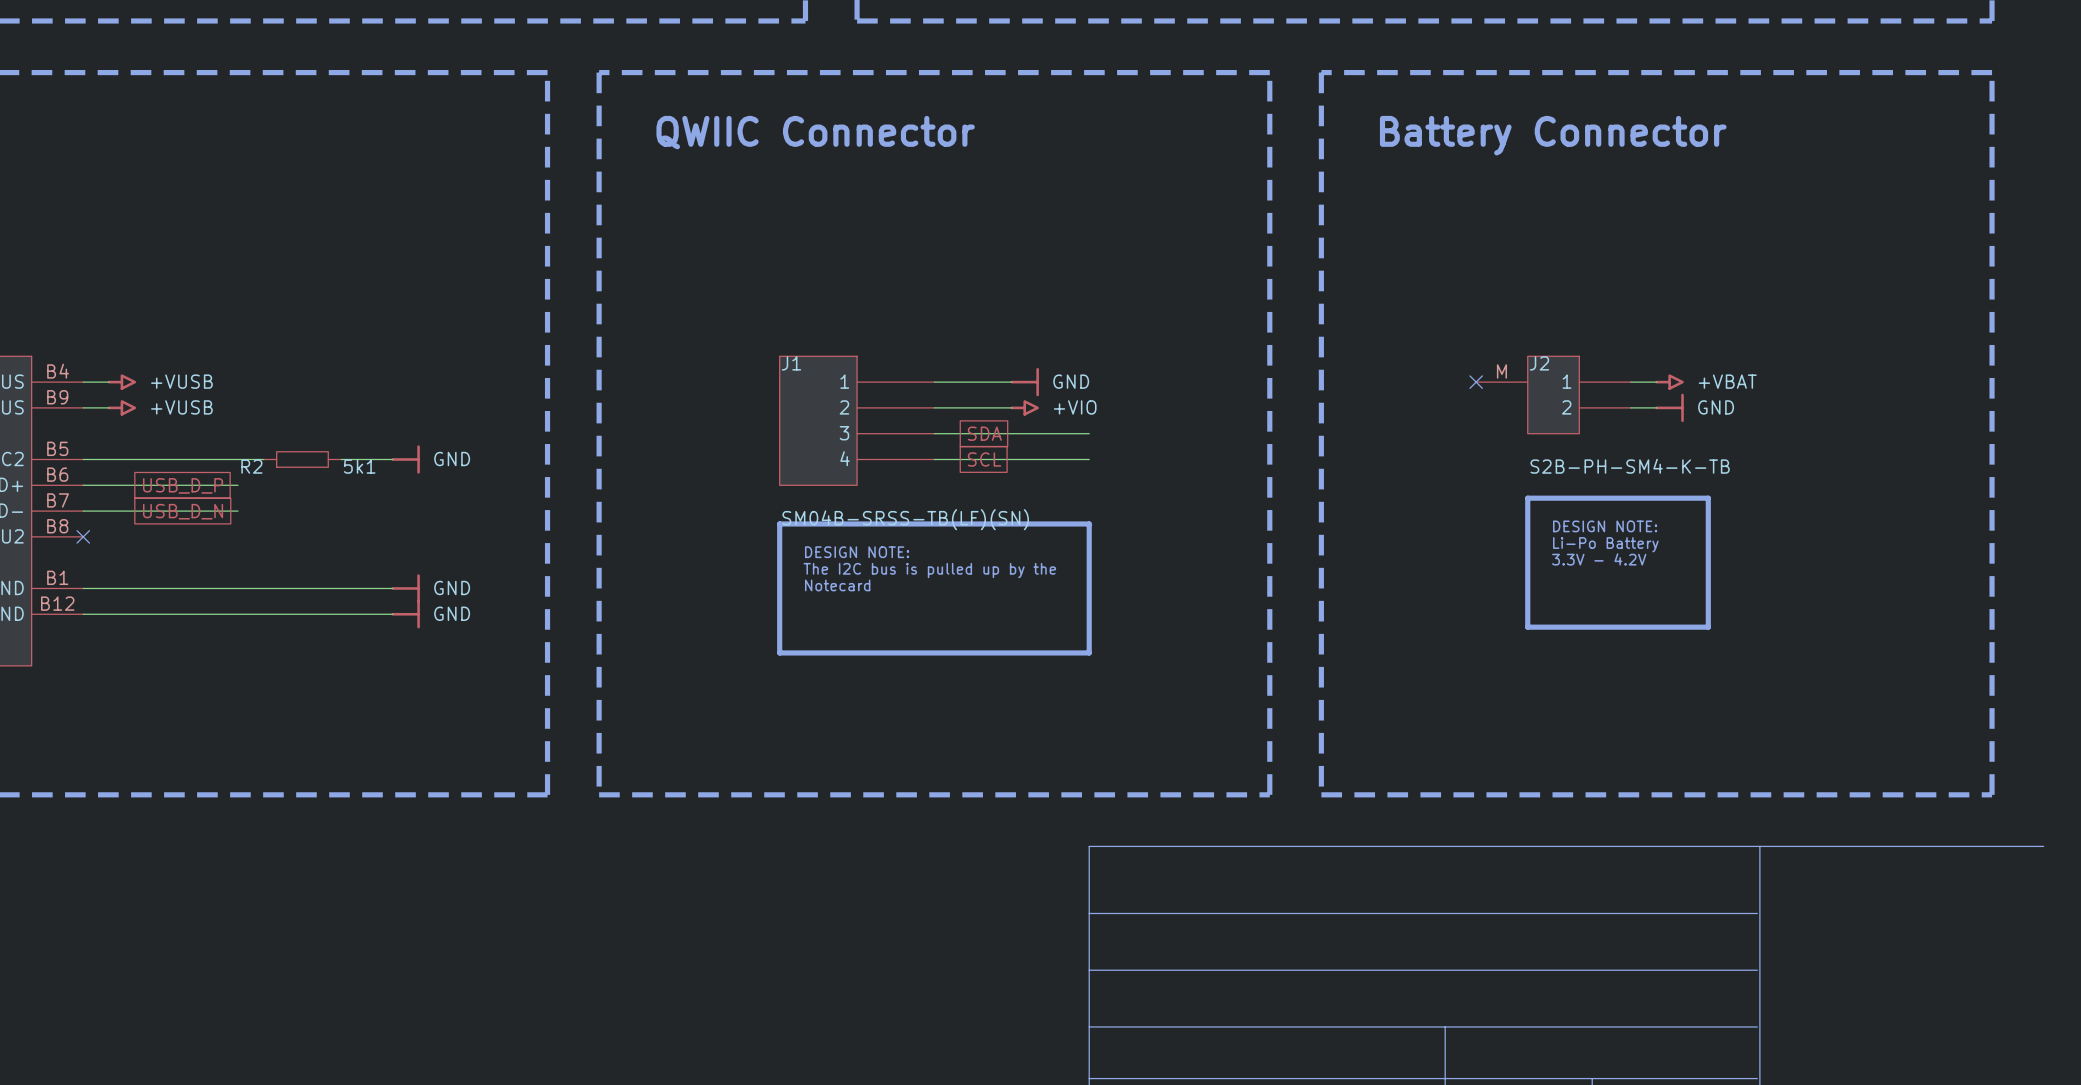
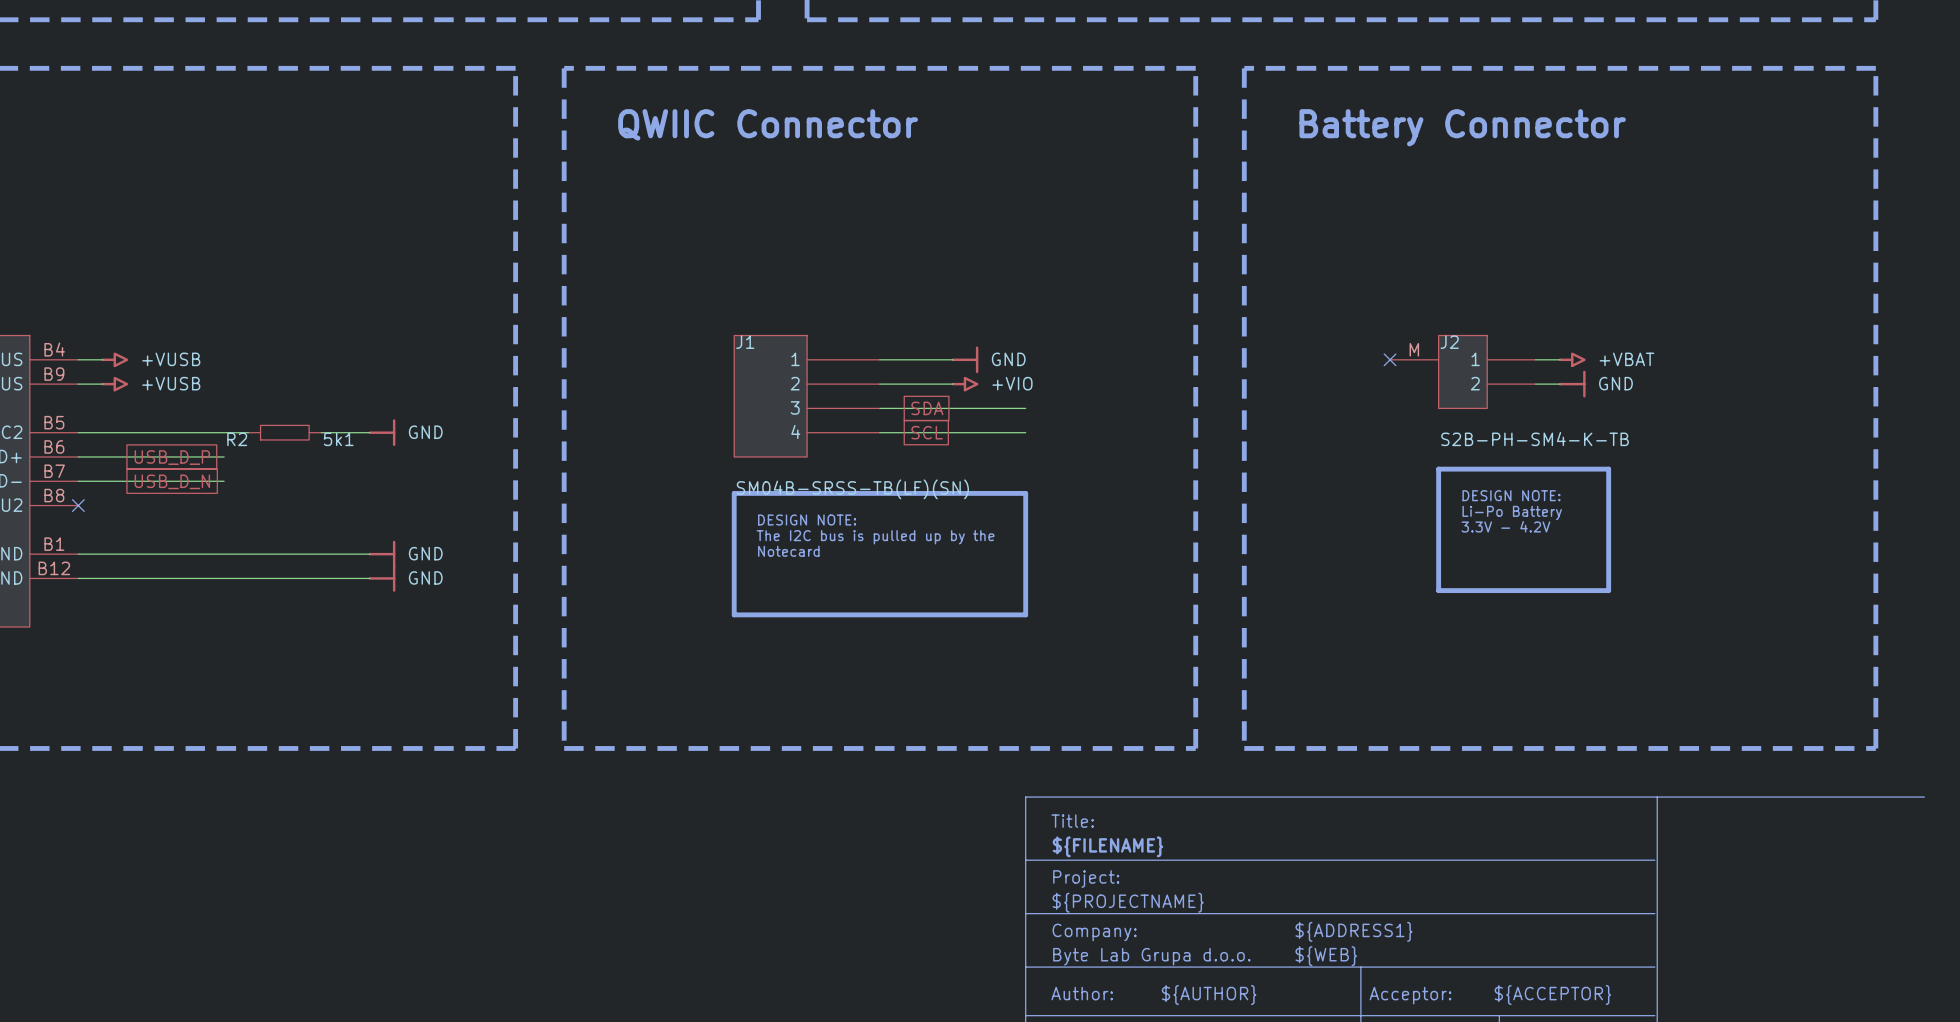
text: none -> Title: (1072, 821)
text: none -> ${FILENAME} (1107, 846)
text: none -> Project: (1086, 878)
text: none -> ${PROJECTNAME} (1128, 902)
text: none -> ${ADDRESS1} (1353, 931)
text: none -> Company: (1094, 932)
text: none -> Byte Lab Grupa d.o.o. (1151, 956)
text: none -> ${WEB} (1326, 956)
text: none -> Author: (1082, 993)
text: none -> ${AUTHOR} (1209, 995)
text: none -> ${ACCEPTOR} (1552, 995)
text: none -> Acceptor: (1410, 995)

